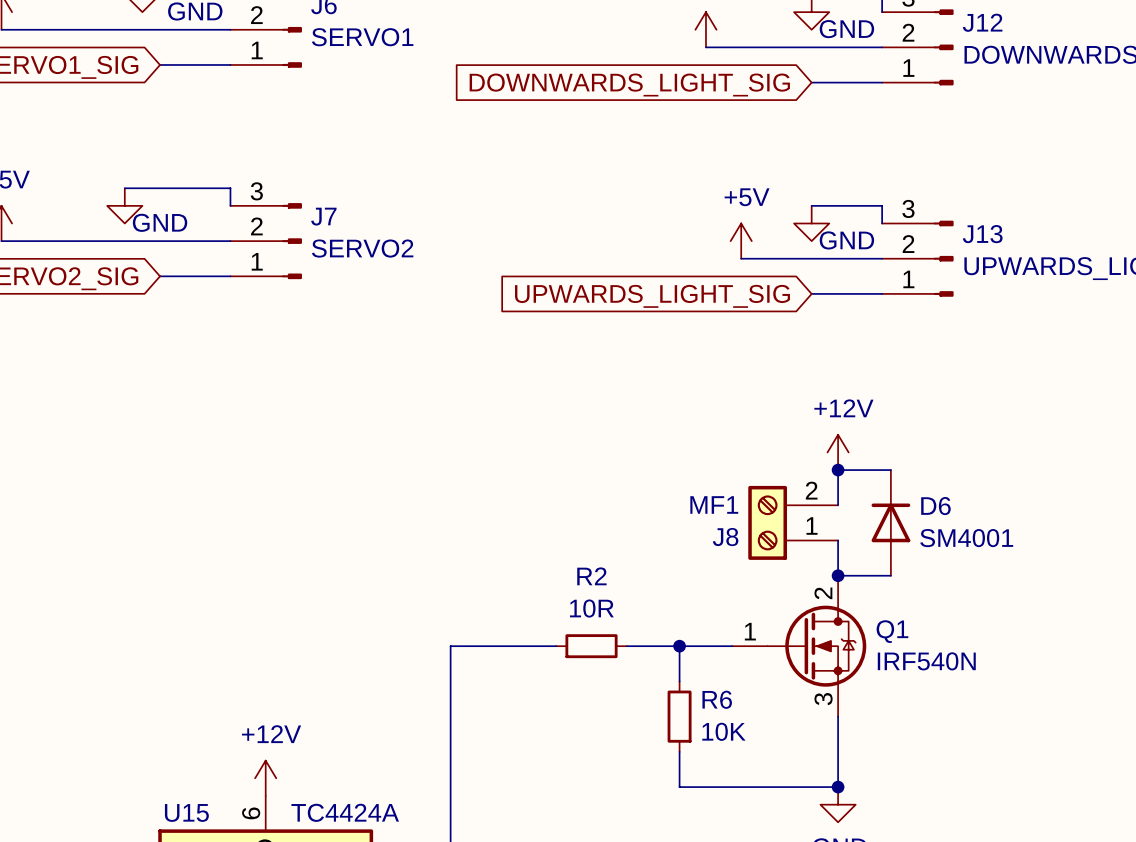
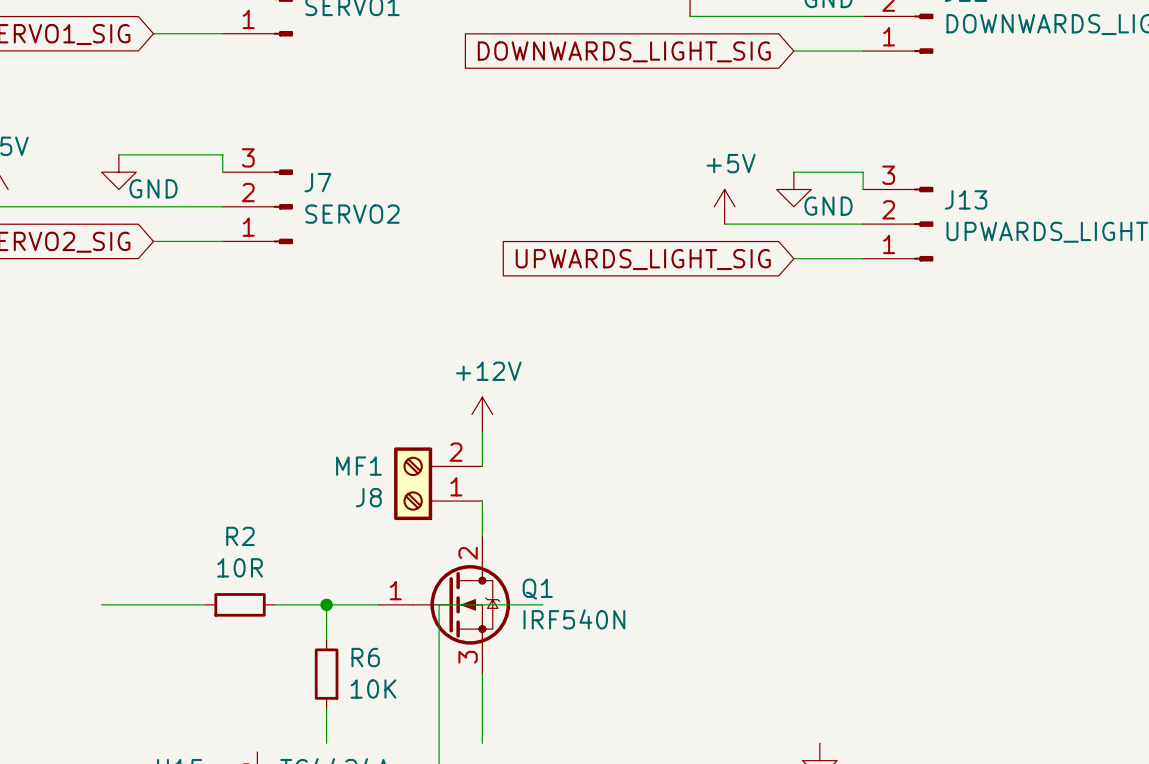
power symbol: none -> +12V (482, 414)
power symbol: +12V (838, 452) -> none
wire: none -> (482, 431) (482, 466)
junction: (838, 470) -> none
wire: (890, 470) (838, 470) (838, 505) -> none
J8 position: (793, 522) -> (438, 483)
D6: SM4001 (890, 522) -> none
wire: none -> (482, 501) (482, 535)
wire: (838, 540) (838, 575) (890, 575) -> none
junction: (838, 575) -> none
wire: none -> (101, 604) (205, 604)
junction: none -> (326, 604)
R2 position: (591, 646) -> (240, 604)
wire: (626, 646) (732, 646) -> (274, 604) (378, 604)
wire: (679, 646) (679, 681) -> (326, 604) (326, 639)
junction: (679, 646) -> none
Q1 position: (799, 646) -> (444, 604)
wire: none -> (482, 674) (482, 743)
R6 position: (679, 716) -> (326, 674)
wire: (838, 716) (838, 787) (679, 787) (679, 751) -> none
wire: none -> (326, 708) (326, 743)
power symbol: +12V (265, 778) -> none
junction: (838, 787) -> none

